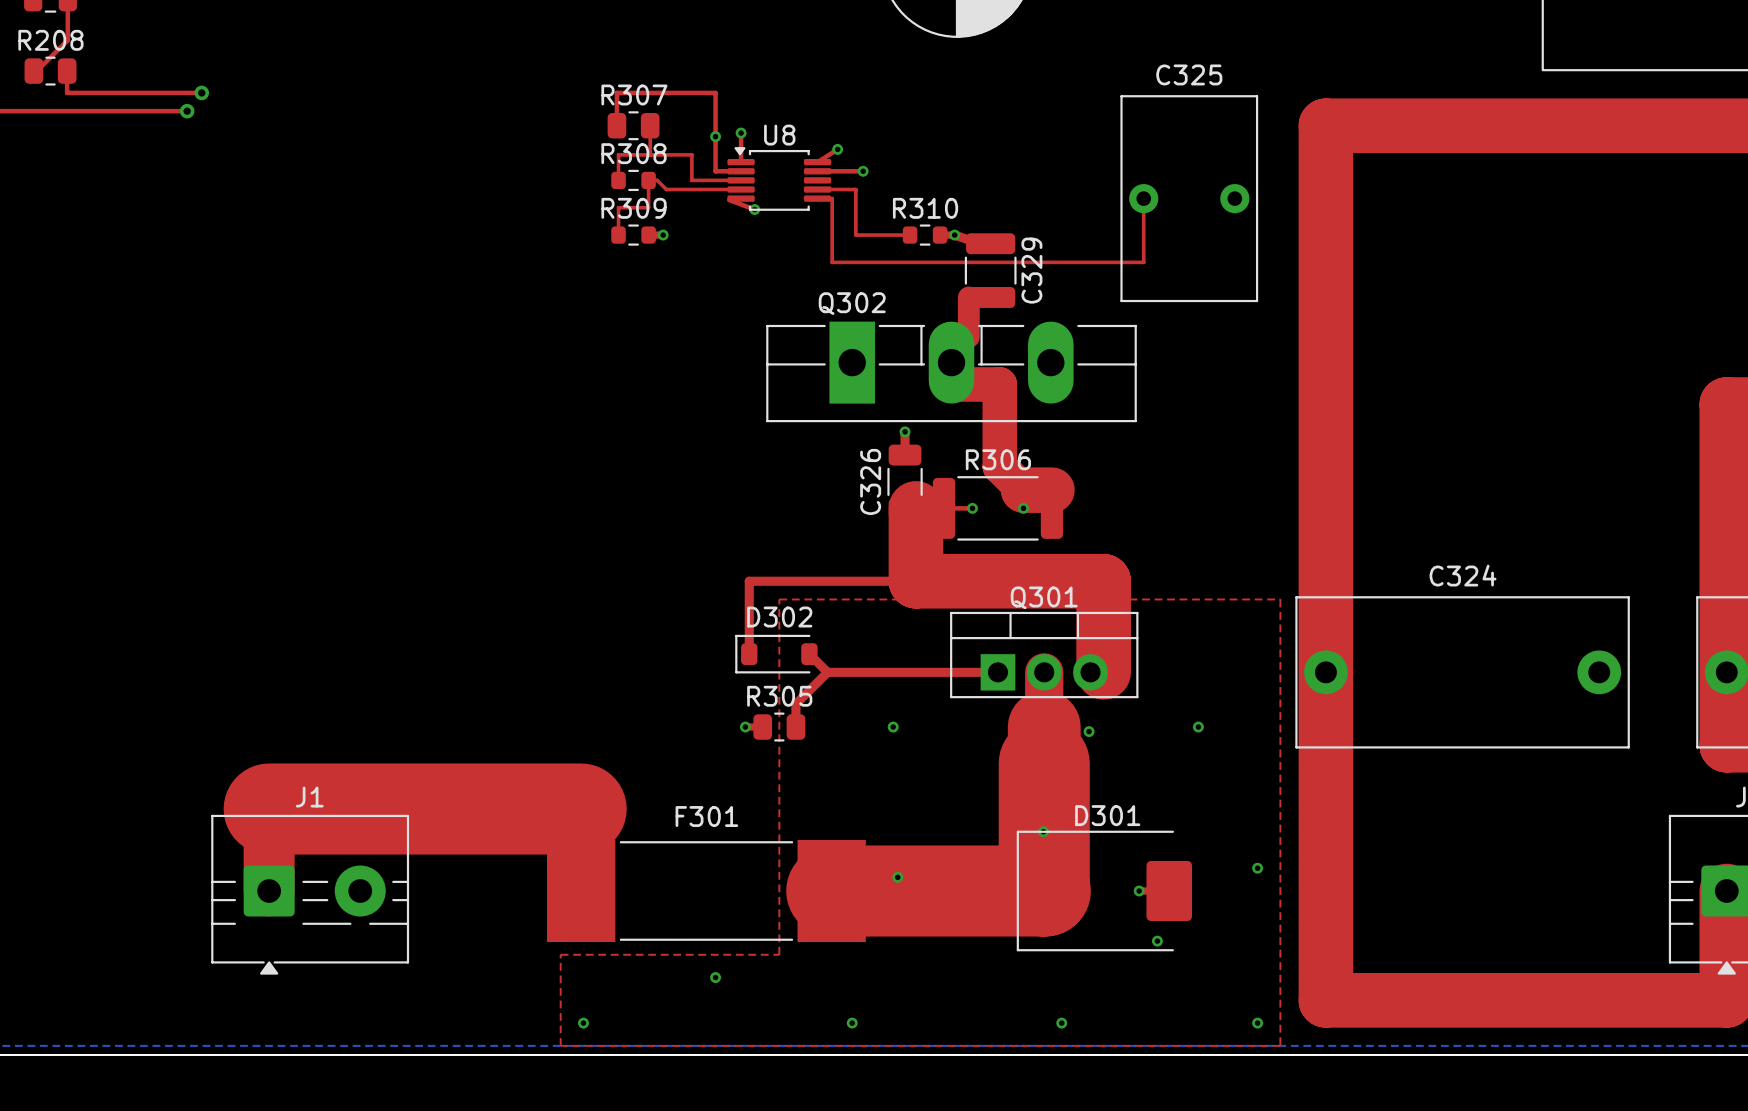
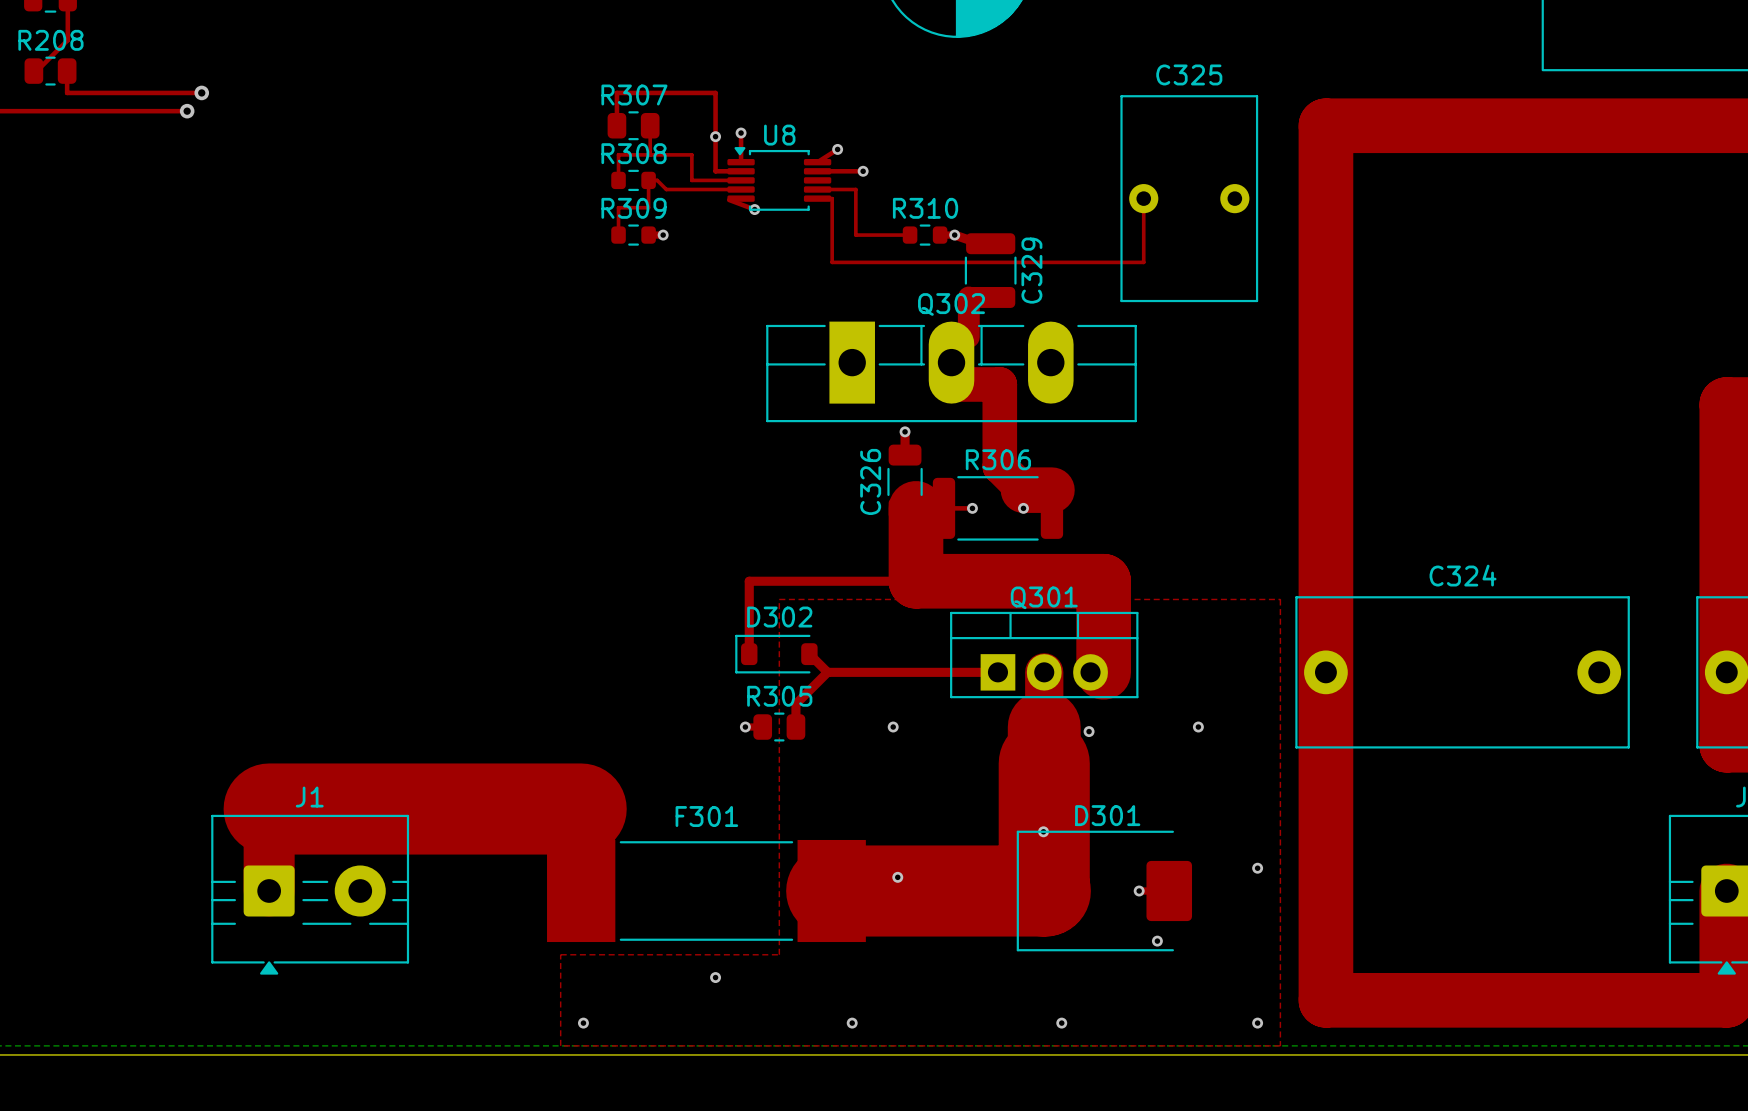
Q302 name position: Q302 (852, 303) -> Q302 (951, 304)

